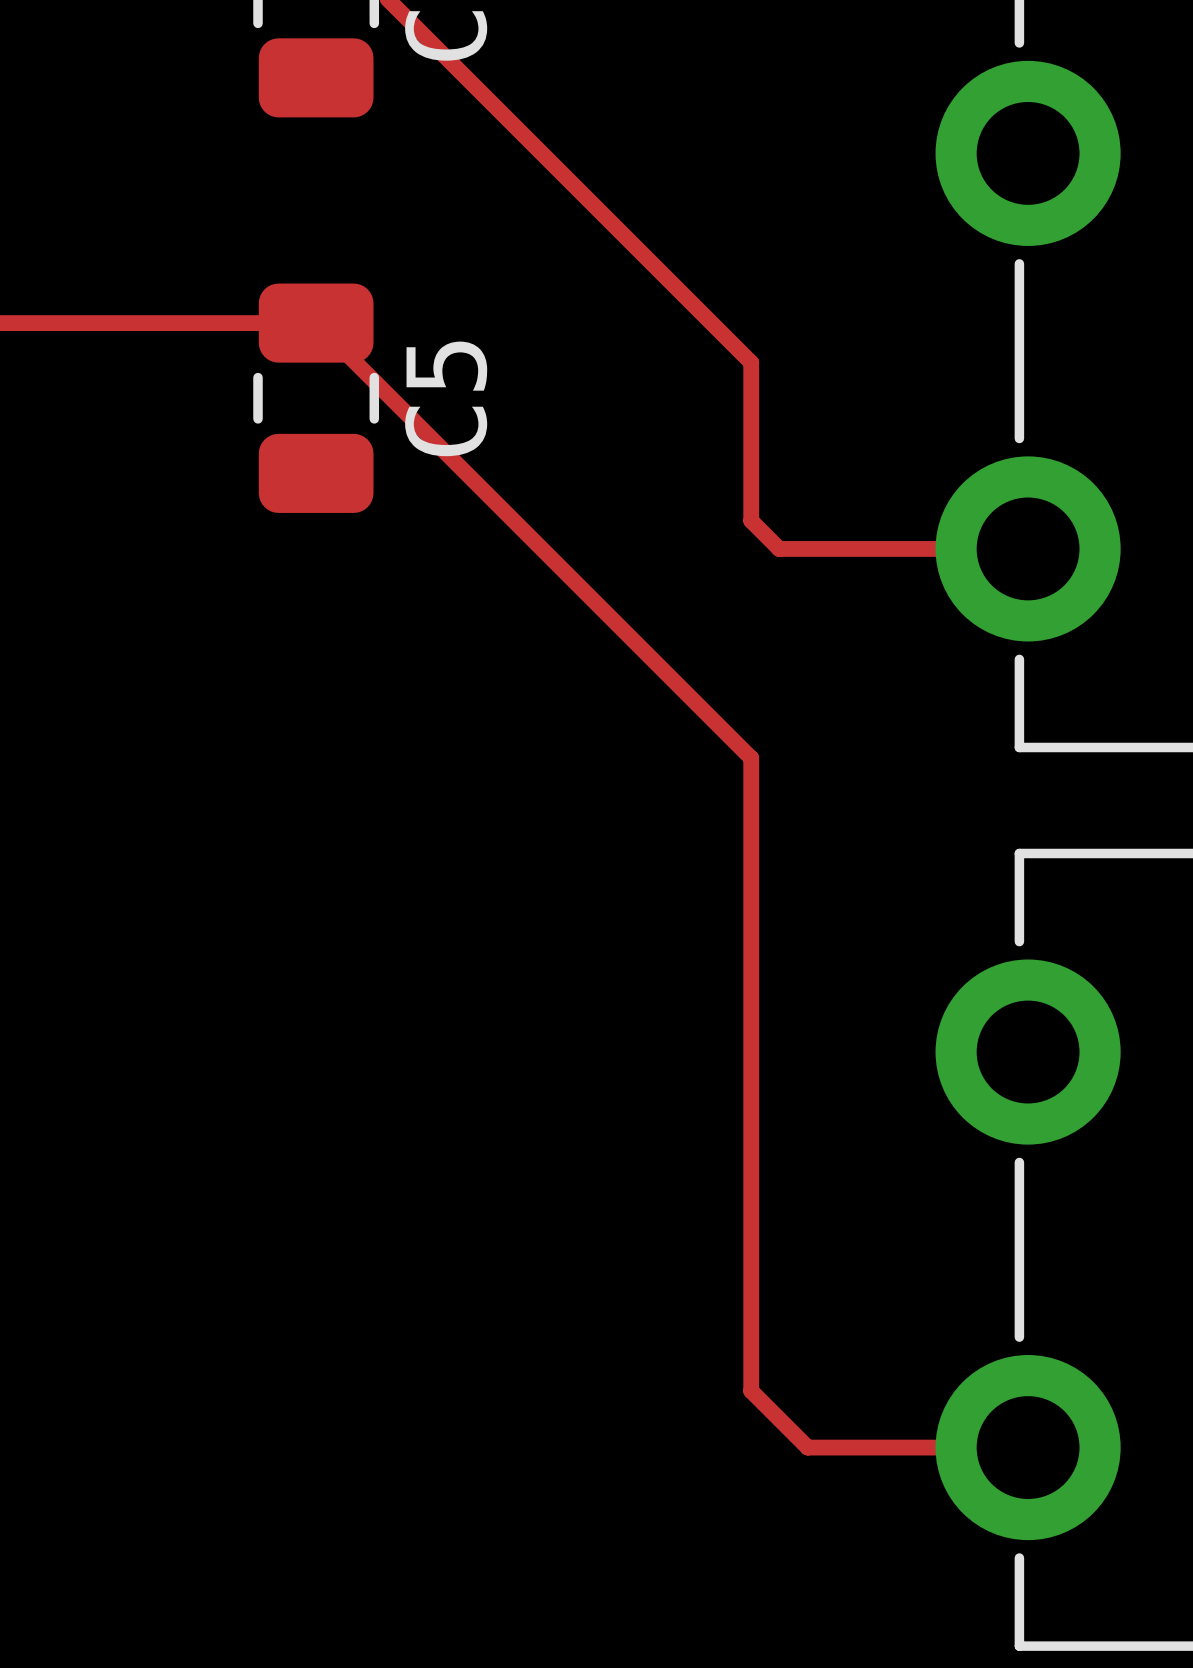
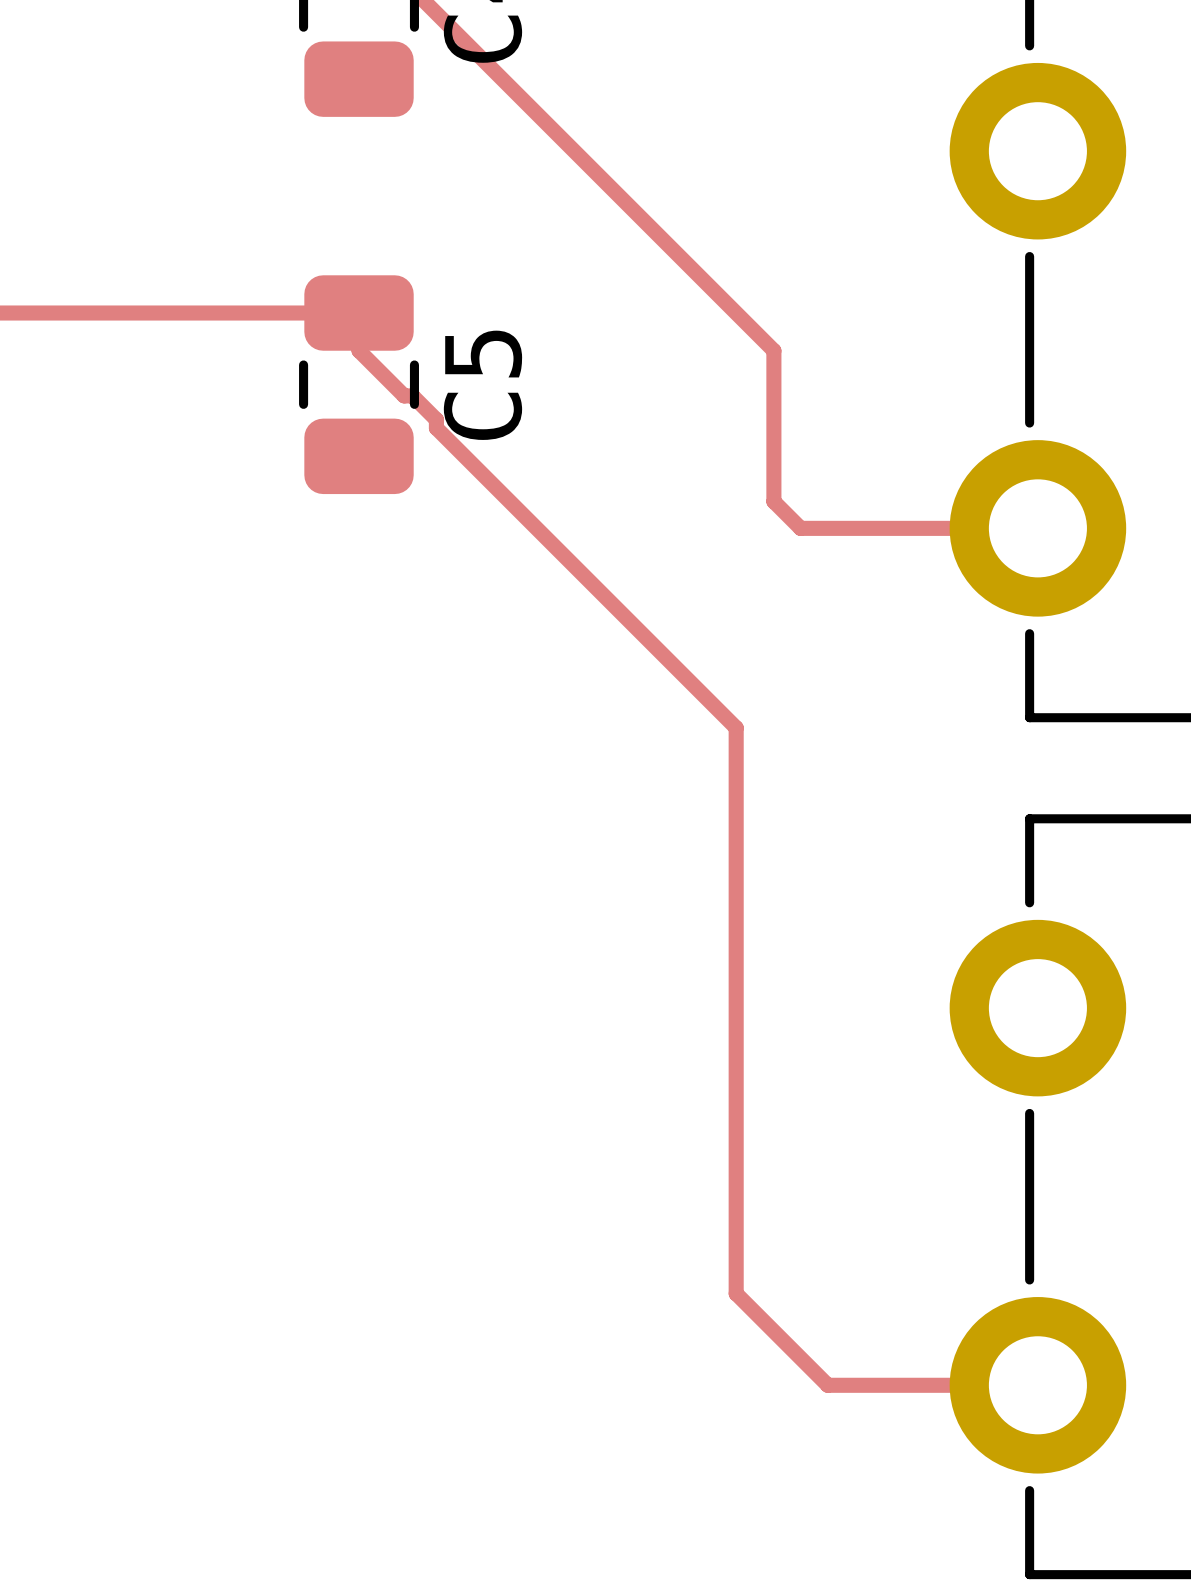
track: (316, 323) (751, 758) (751, 1391) -> (359, 313) (359, 350) (404, 395) (412, 395) (436, 419) (436, 428) (736, 727) (736, 1293) (773, 1331)

